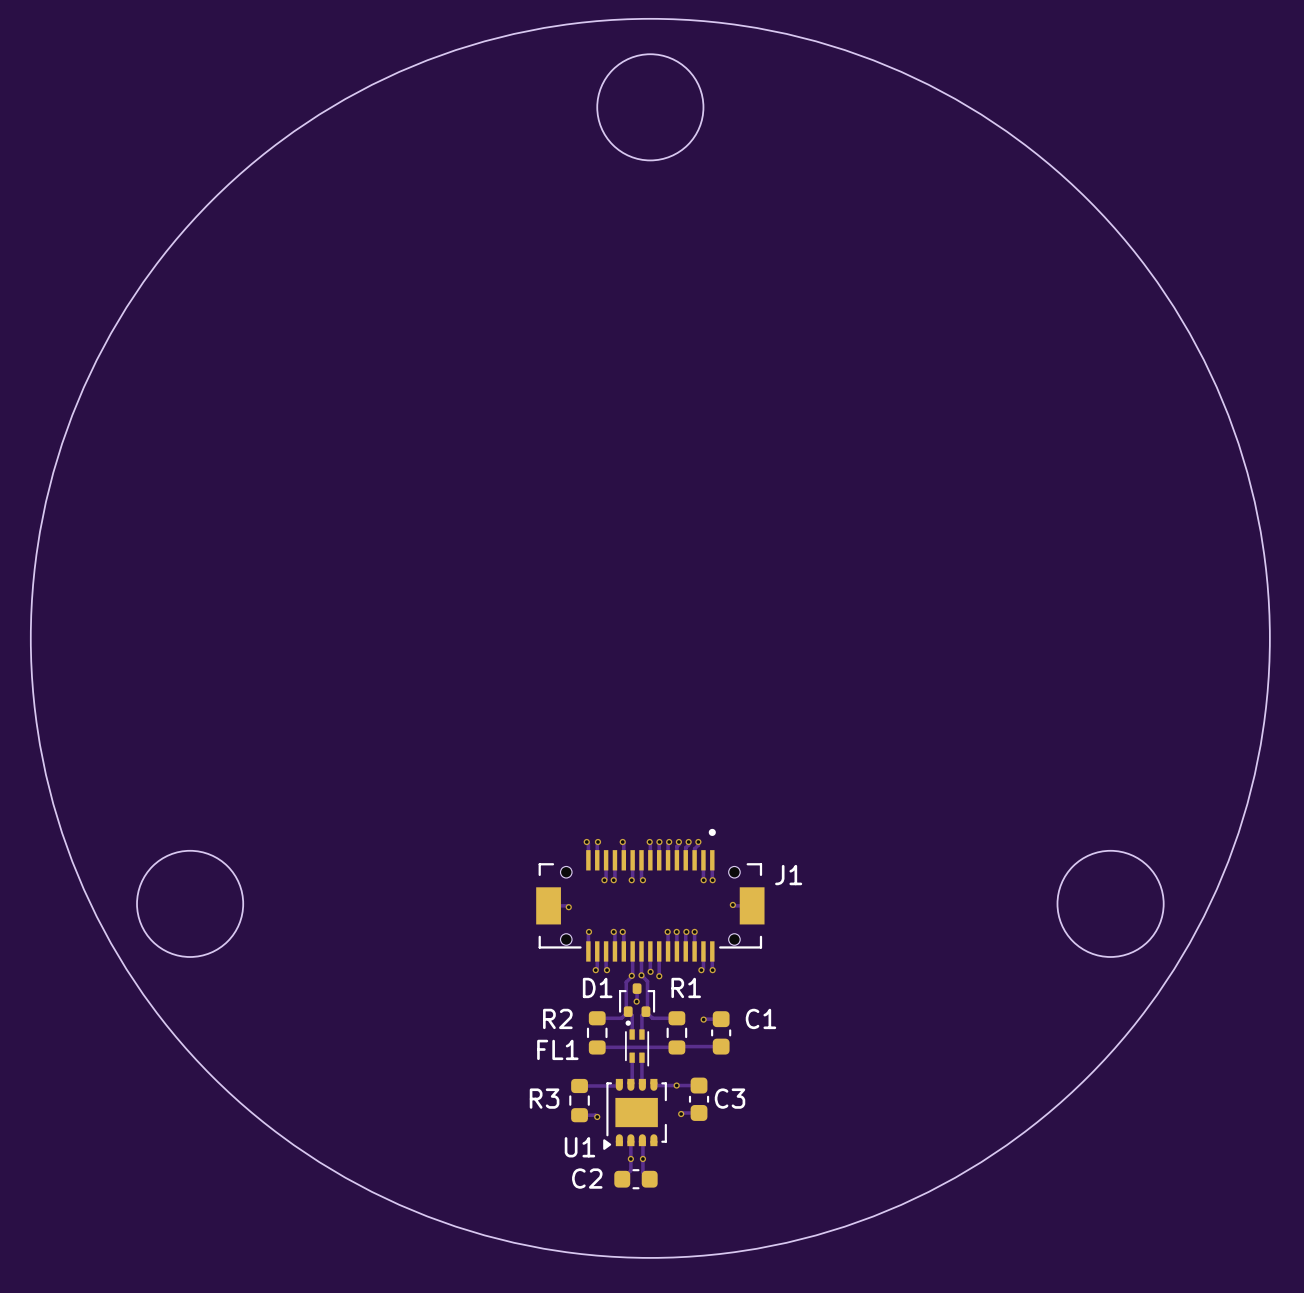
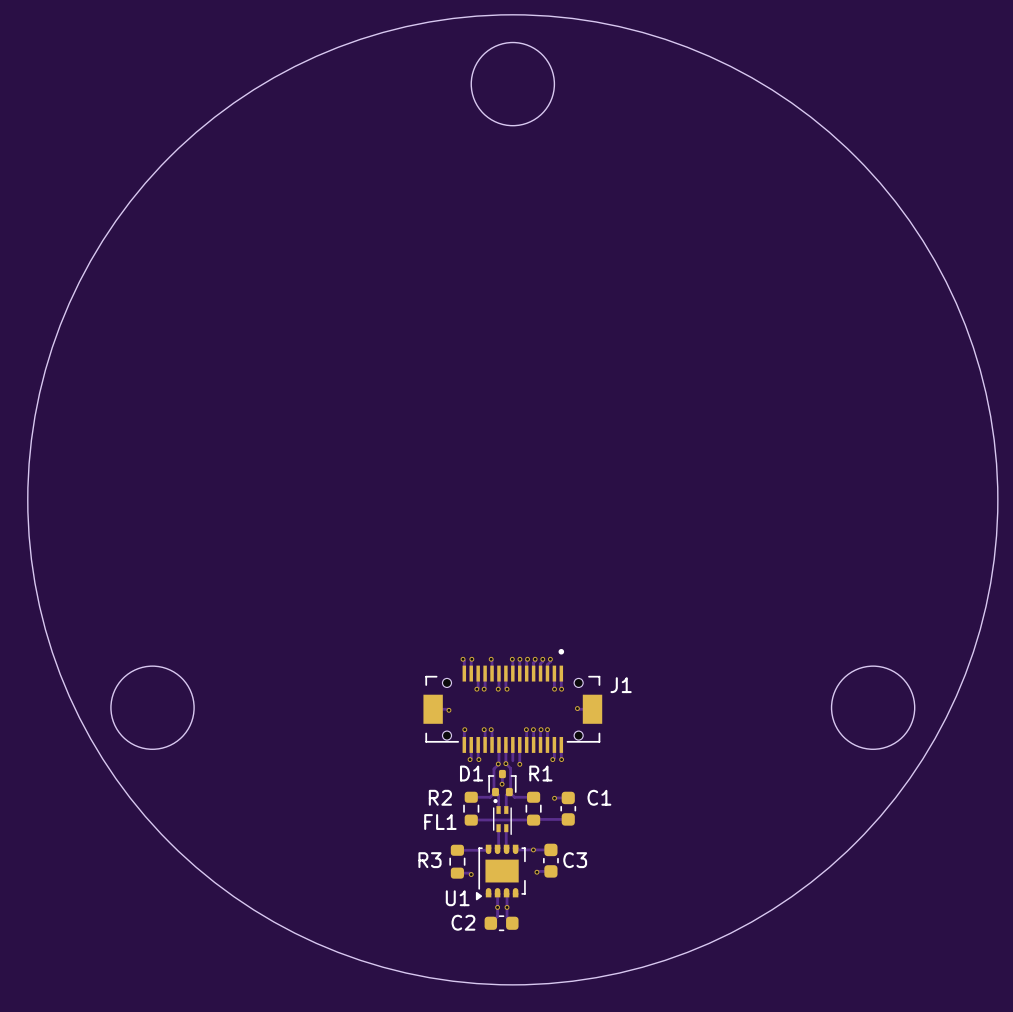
via: (650, 971) -> none

